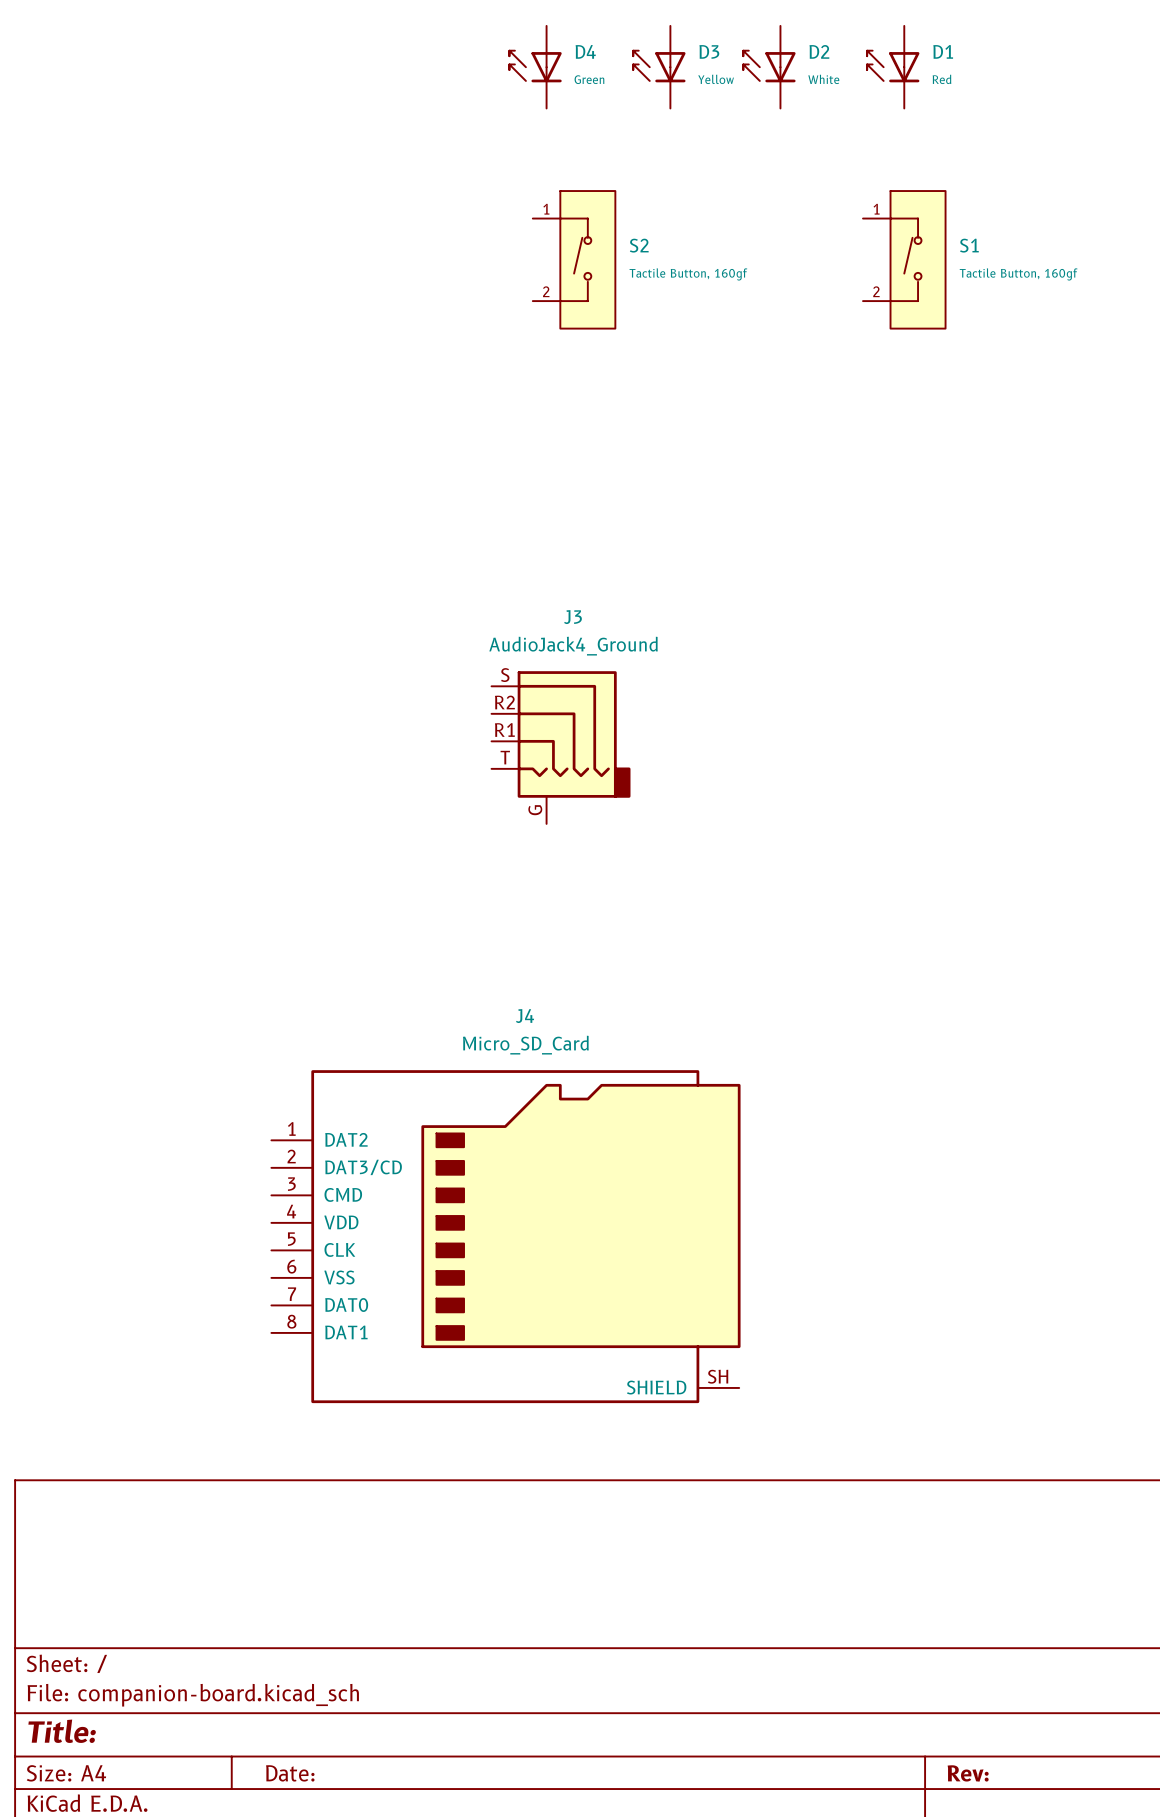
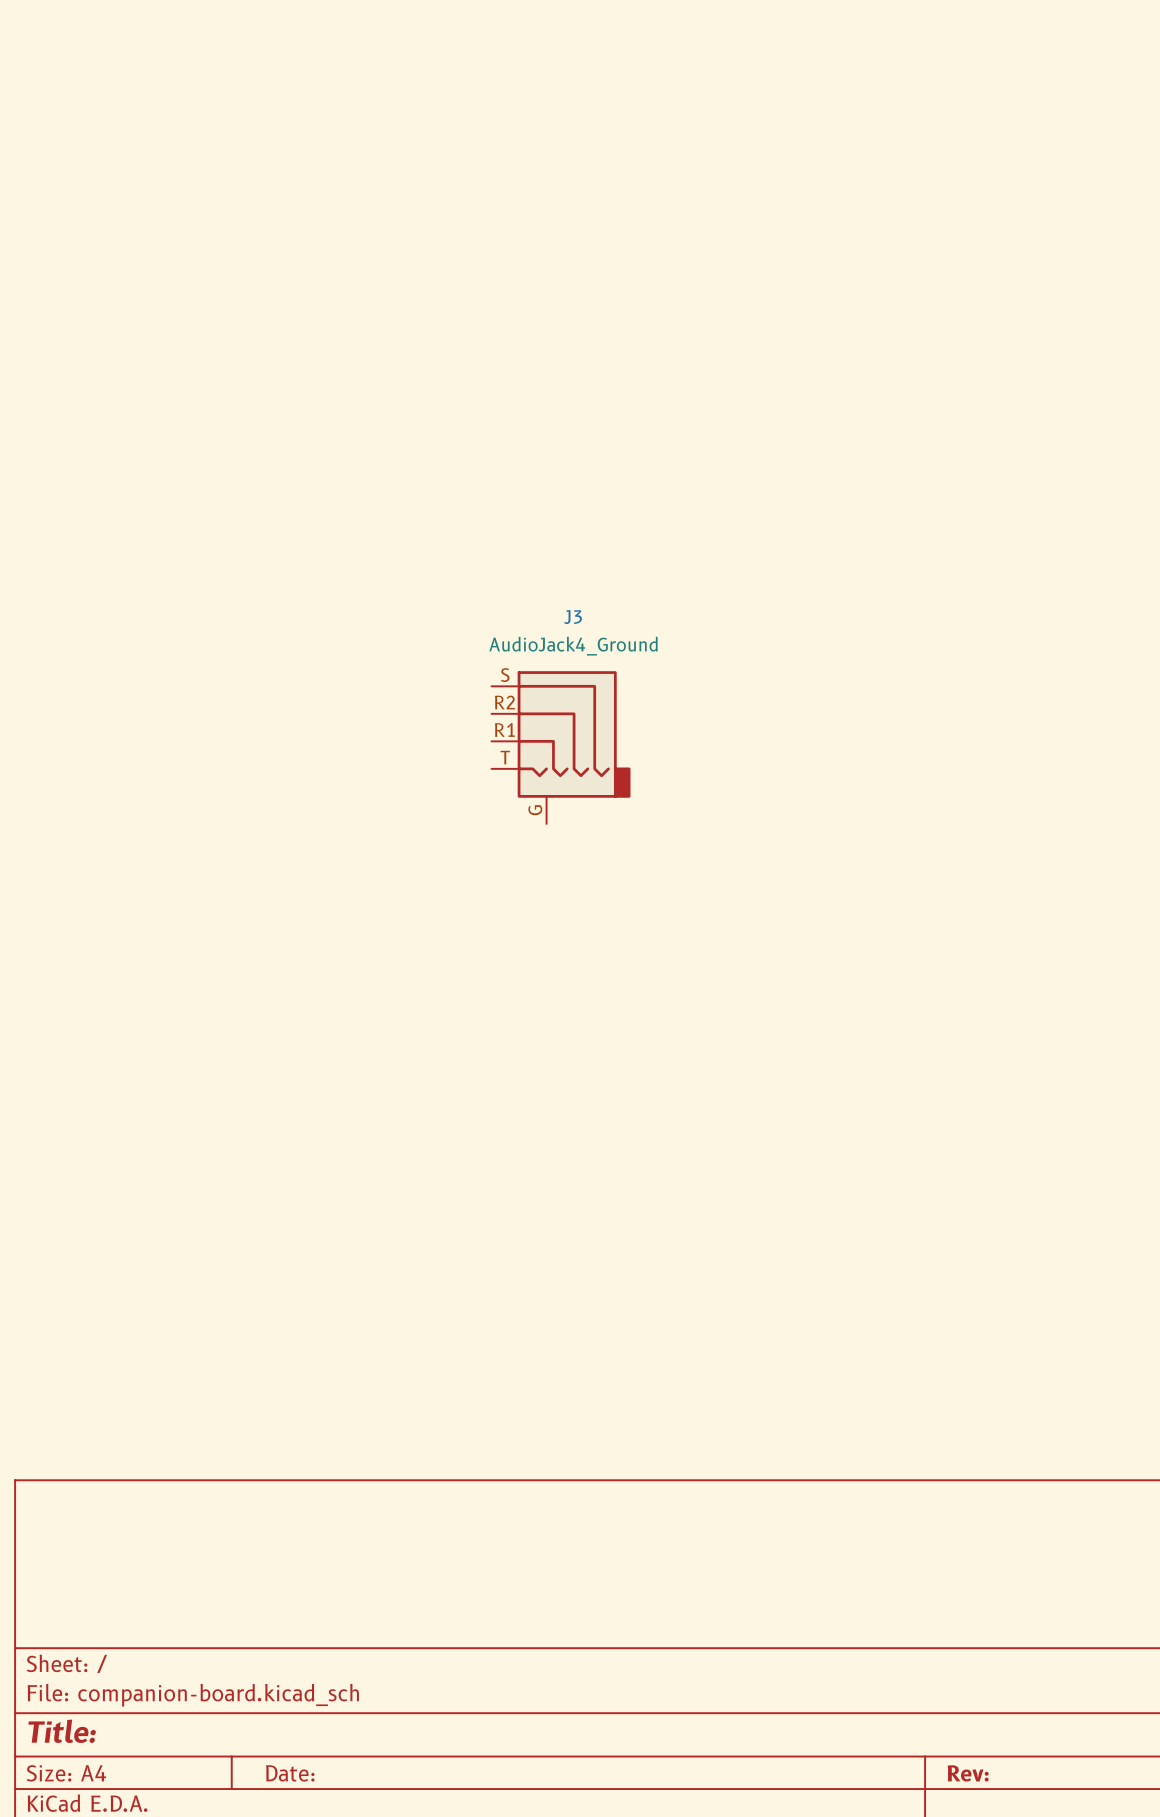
D4: Green (535, 67) -> none
D3: Yellow (659, 67) -> none
D2: White (769, 67) -> none
D1: Red (892, 67) -> none
S2: Tactile Button, 160gf (574, 259) -> none
S1: Tactile Button, 160gf (904, 259) -> none
J4: Micro_SD_Card (505, 1236) -> none

